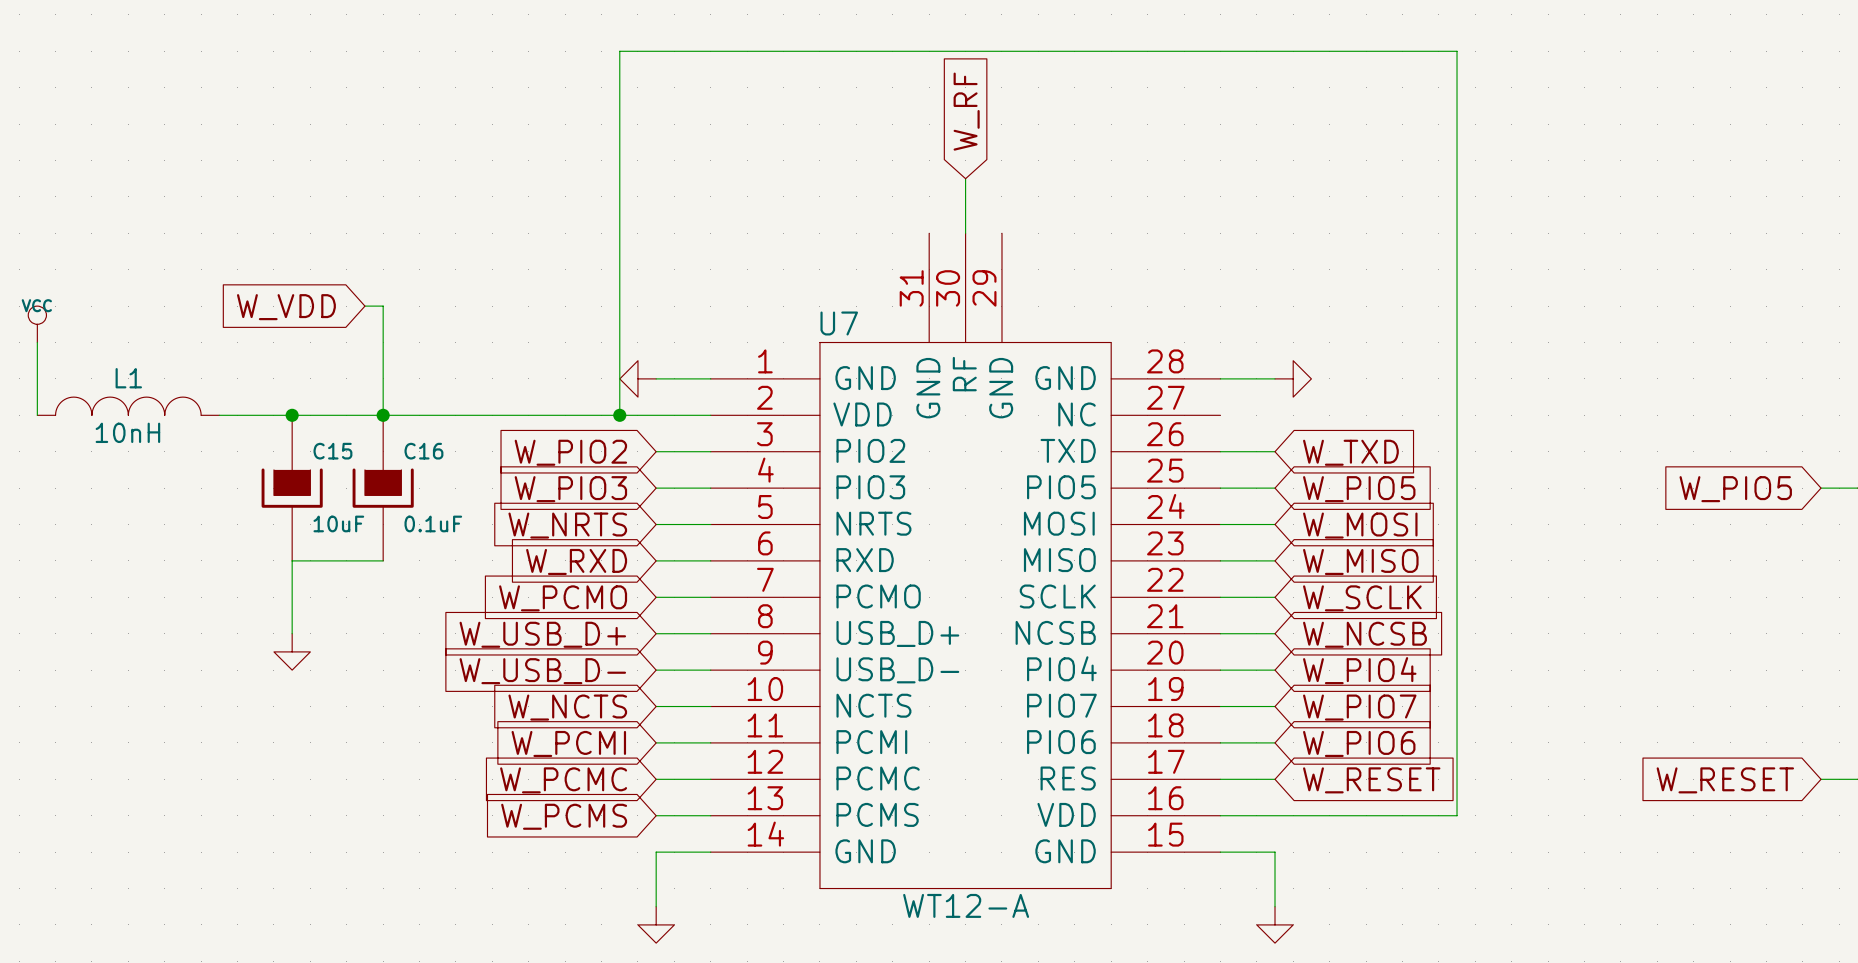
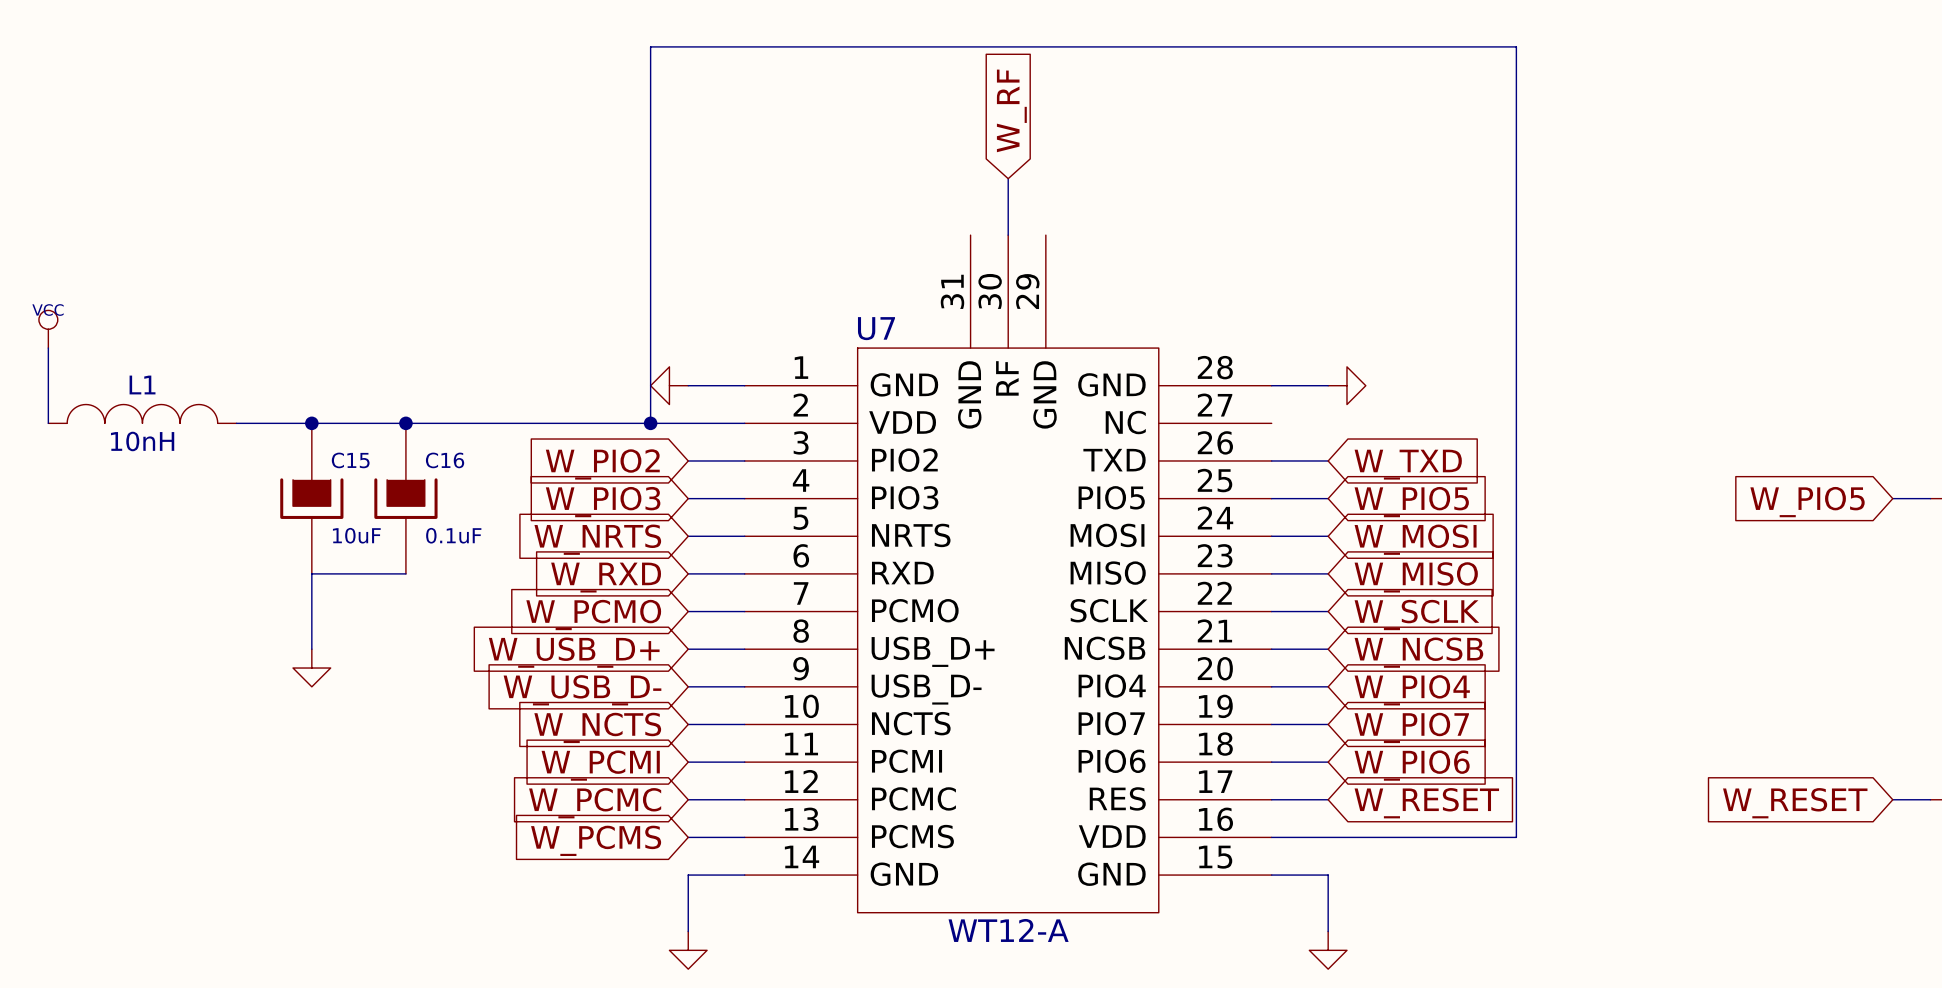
wire: (364, 306) (383, 306) (383, 415) -> none
global label: W_VDD (286, 307) -> none

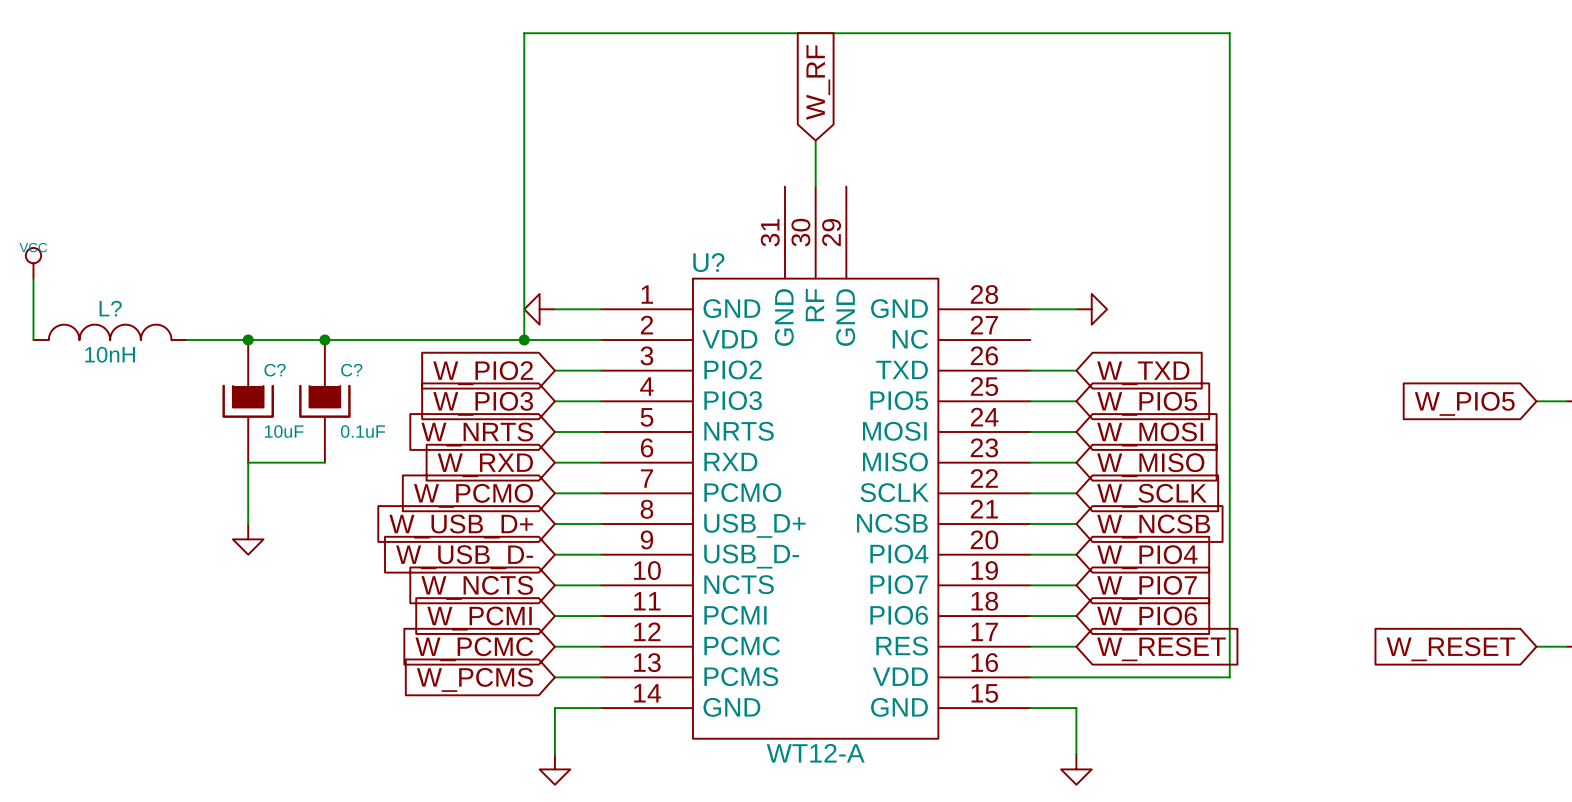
U7 name: U7 (876, 328) -> U? (708, 262)
L1 name: L1 (142, 385) -> L? (110, 308)
C15 name: C15 (350, 460) -> C? (275, 370)
C16 name: C16 (445, 460) -> C? (351, 370)

